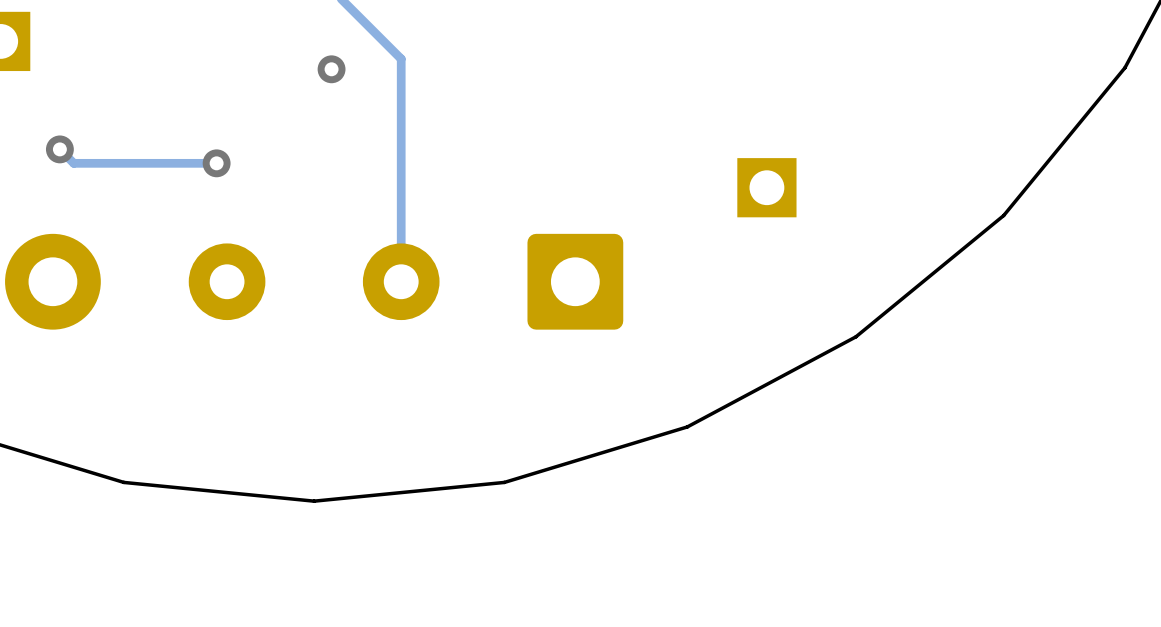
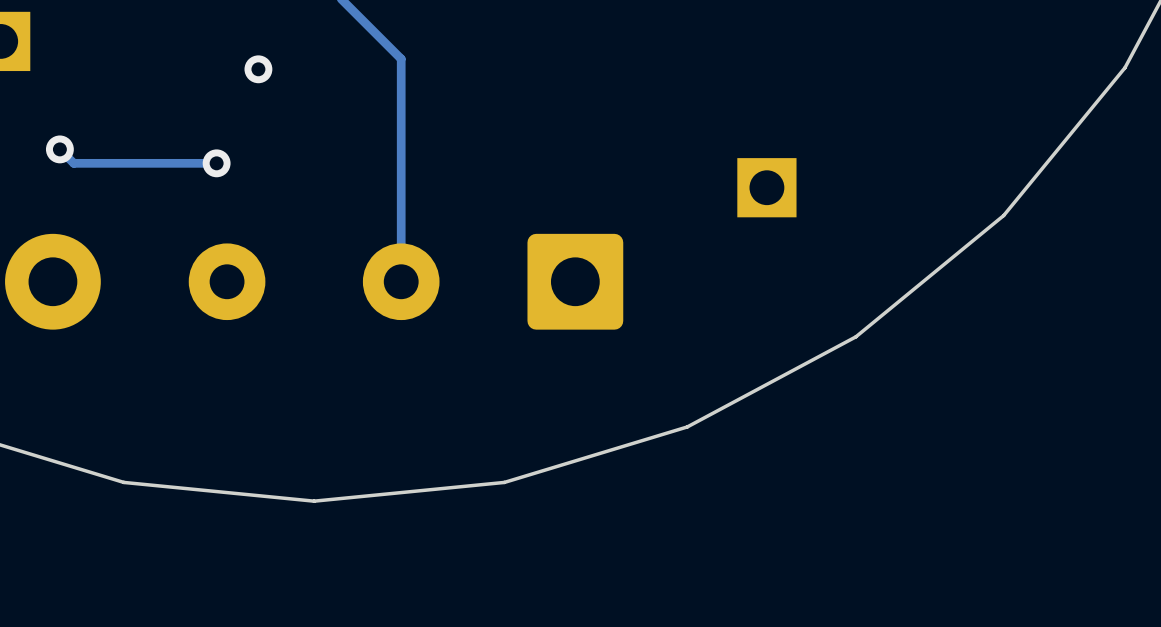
via: none -> (258, 69)
via: (331, 69) -> none

